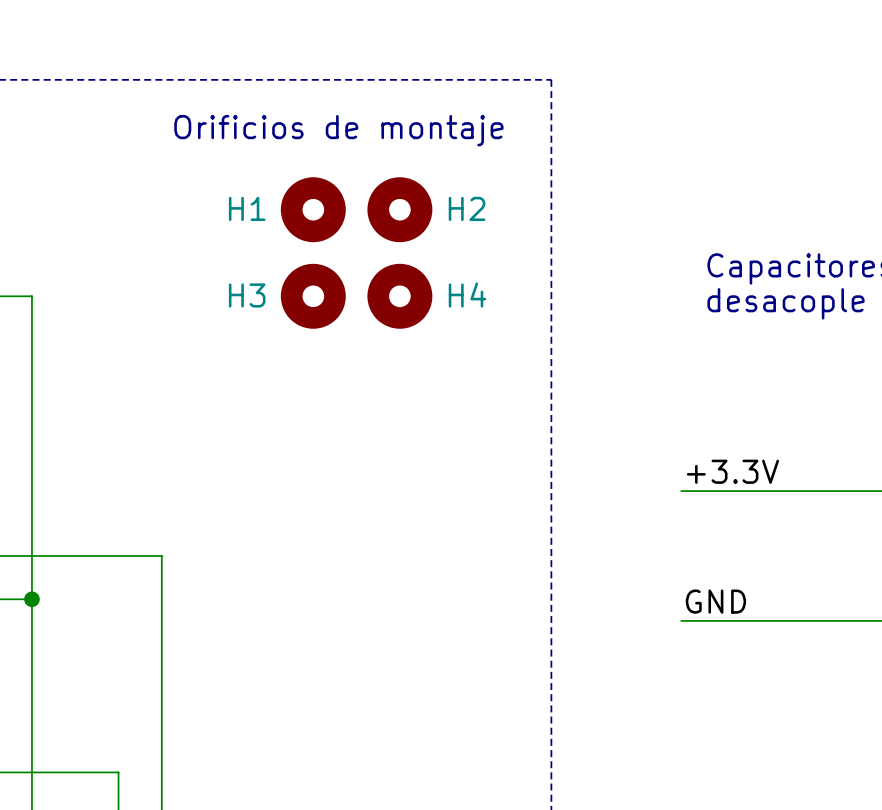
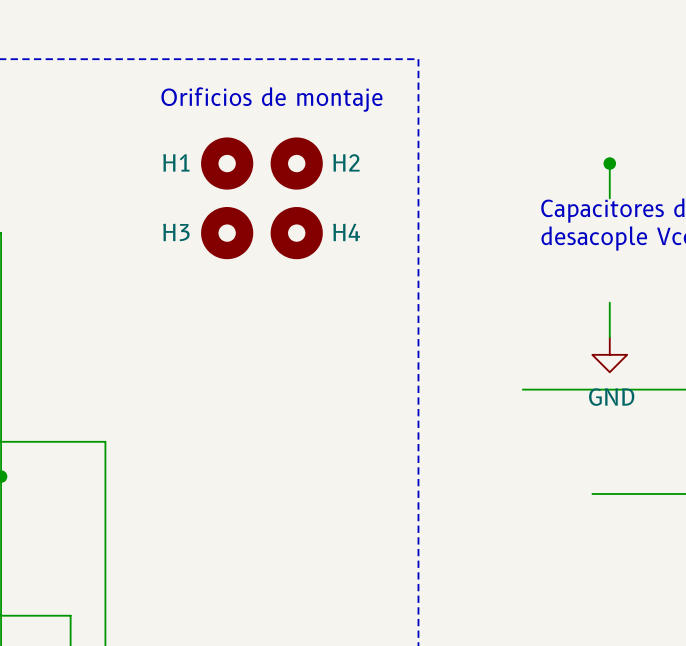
wire: none -> (609, 163) (609, 198)
junction: none -> (609, 163)
wire: none -> (609, 302) (609, 337)
power symbol: none -> GND (609, 354)
label: +3.3V (732, 471) -> none
label: GND (715, 601) -> none
wire: (681, 620) (767, 620) -> none

